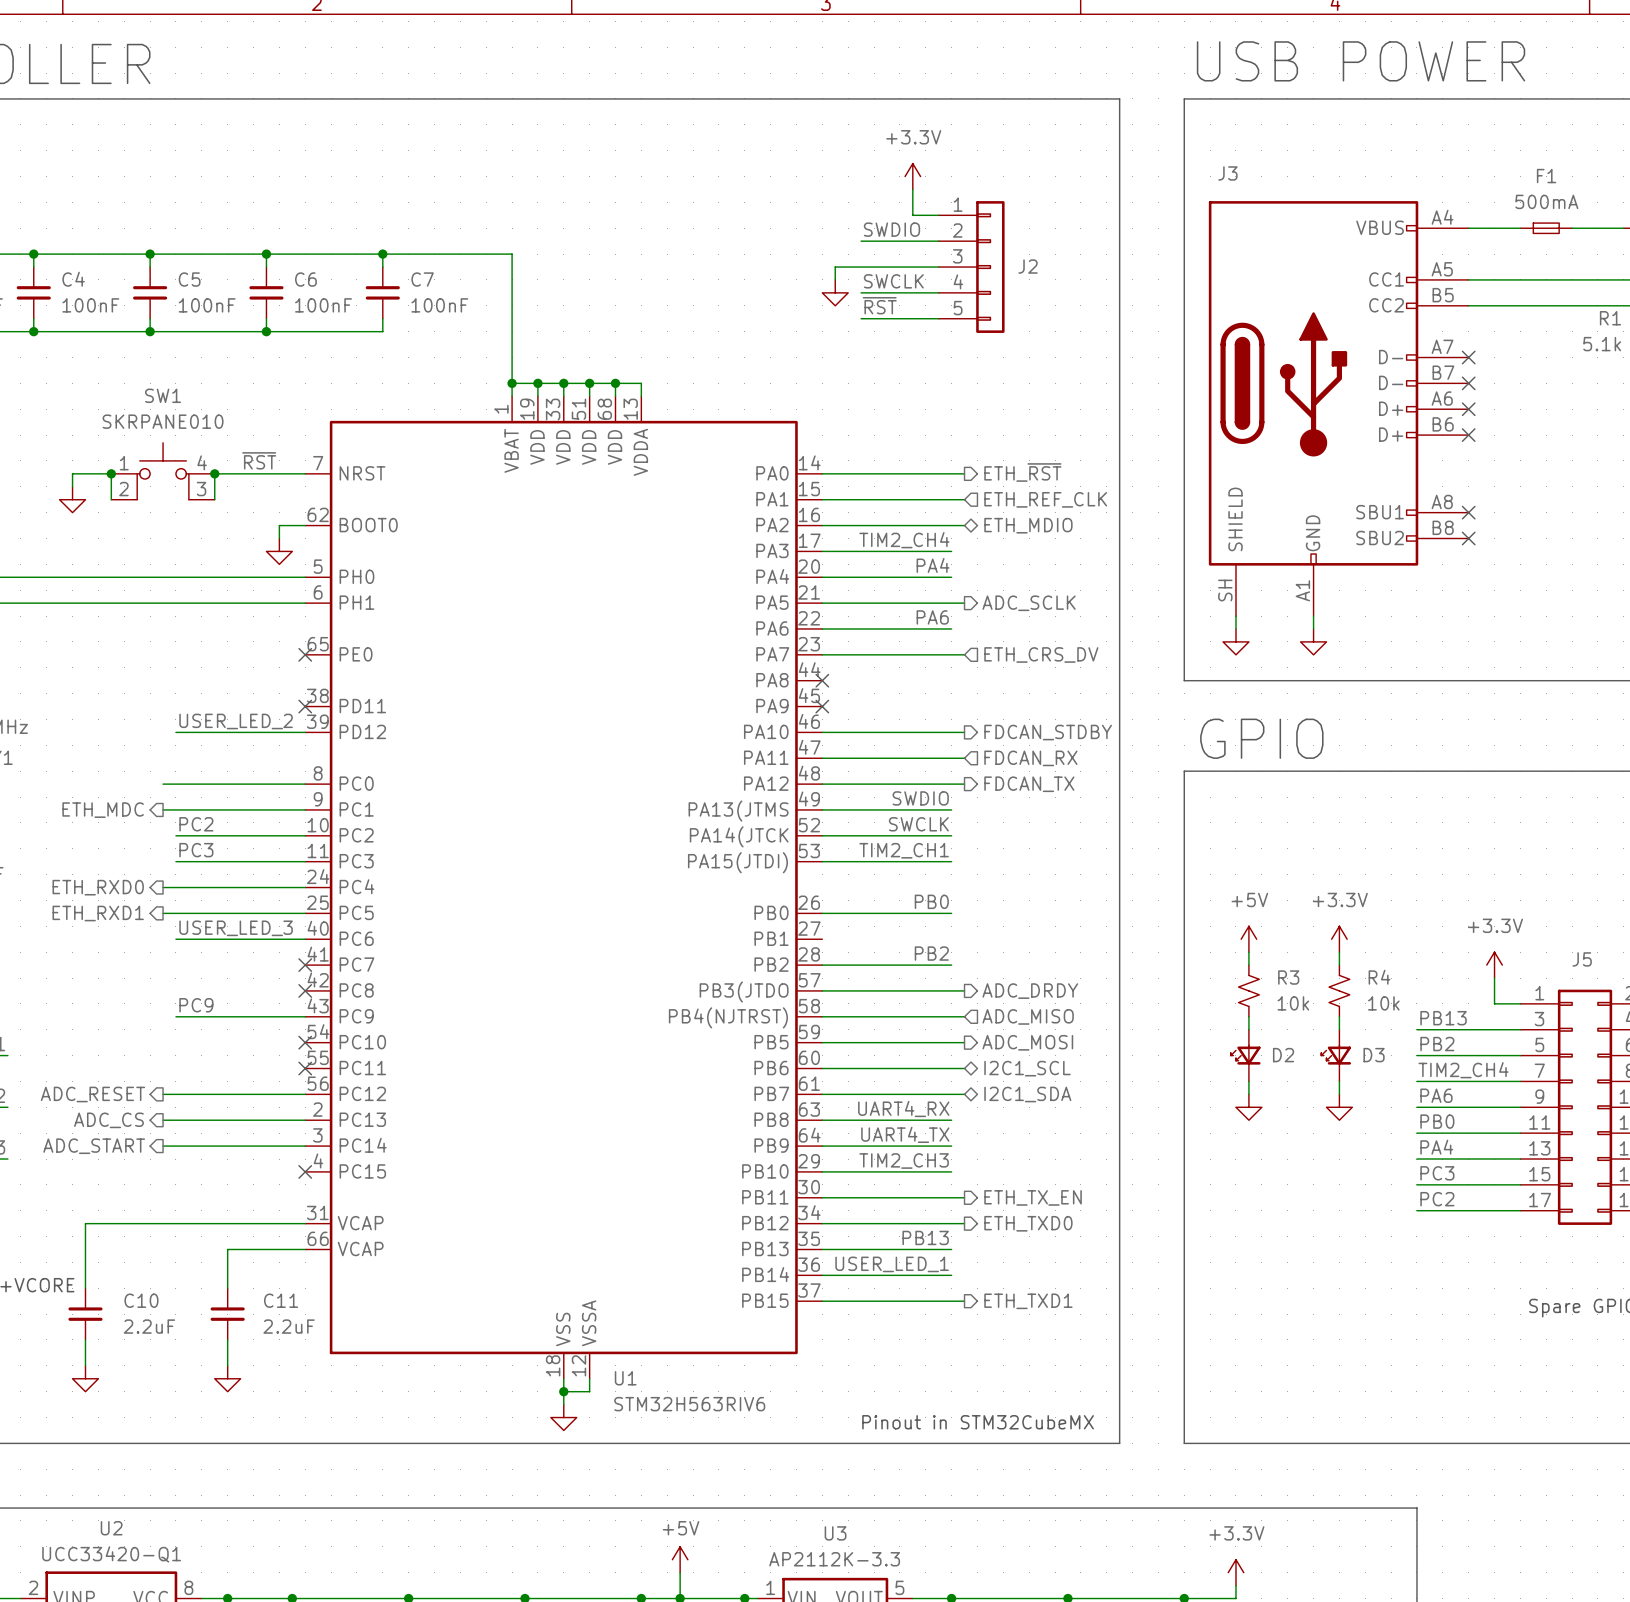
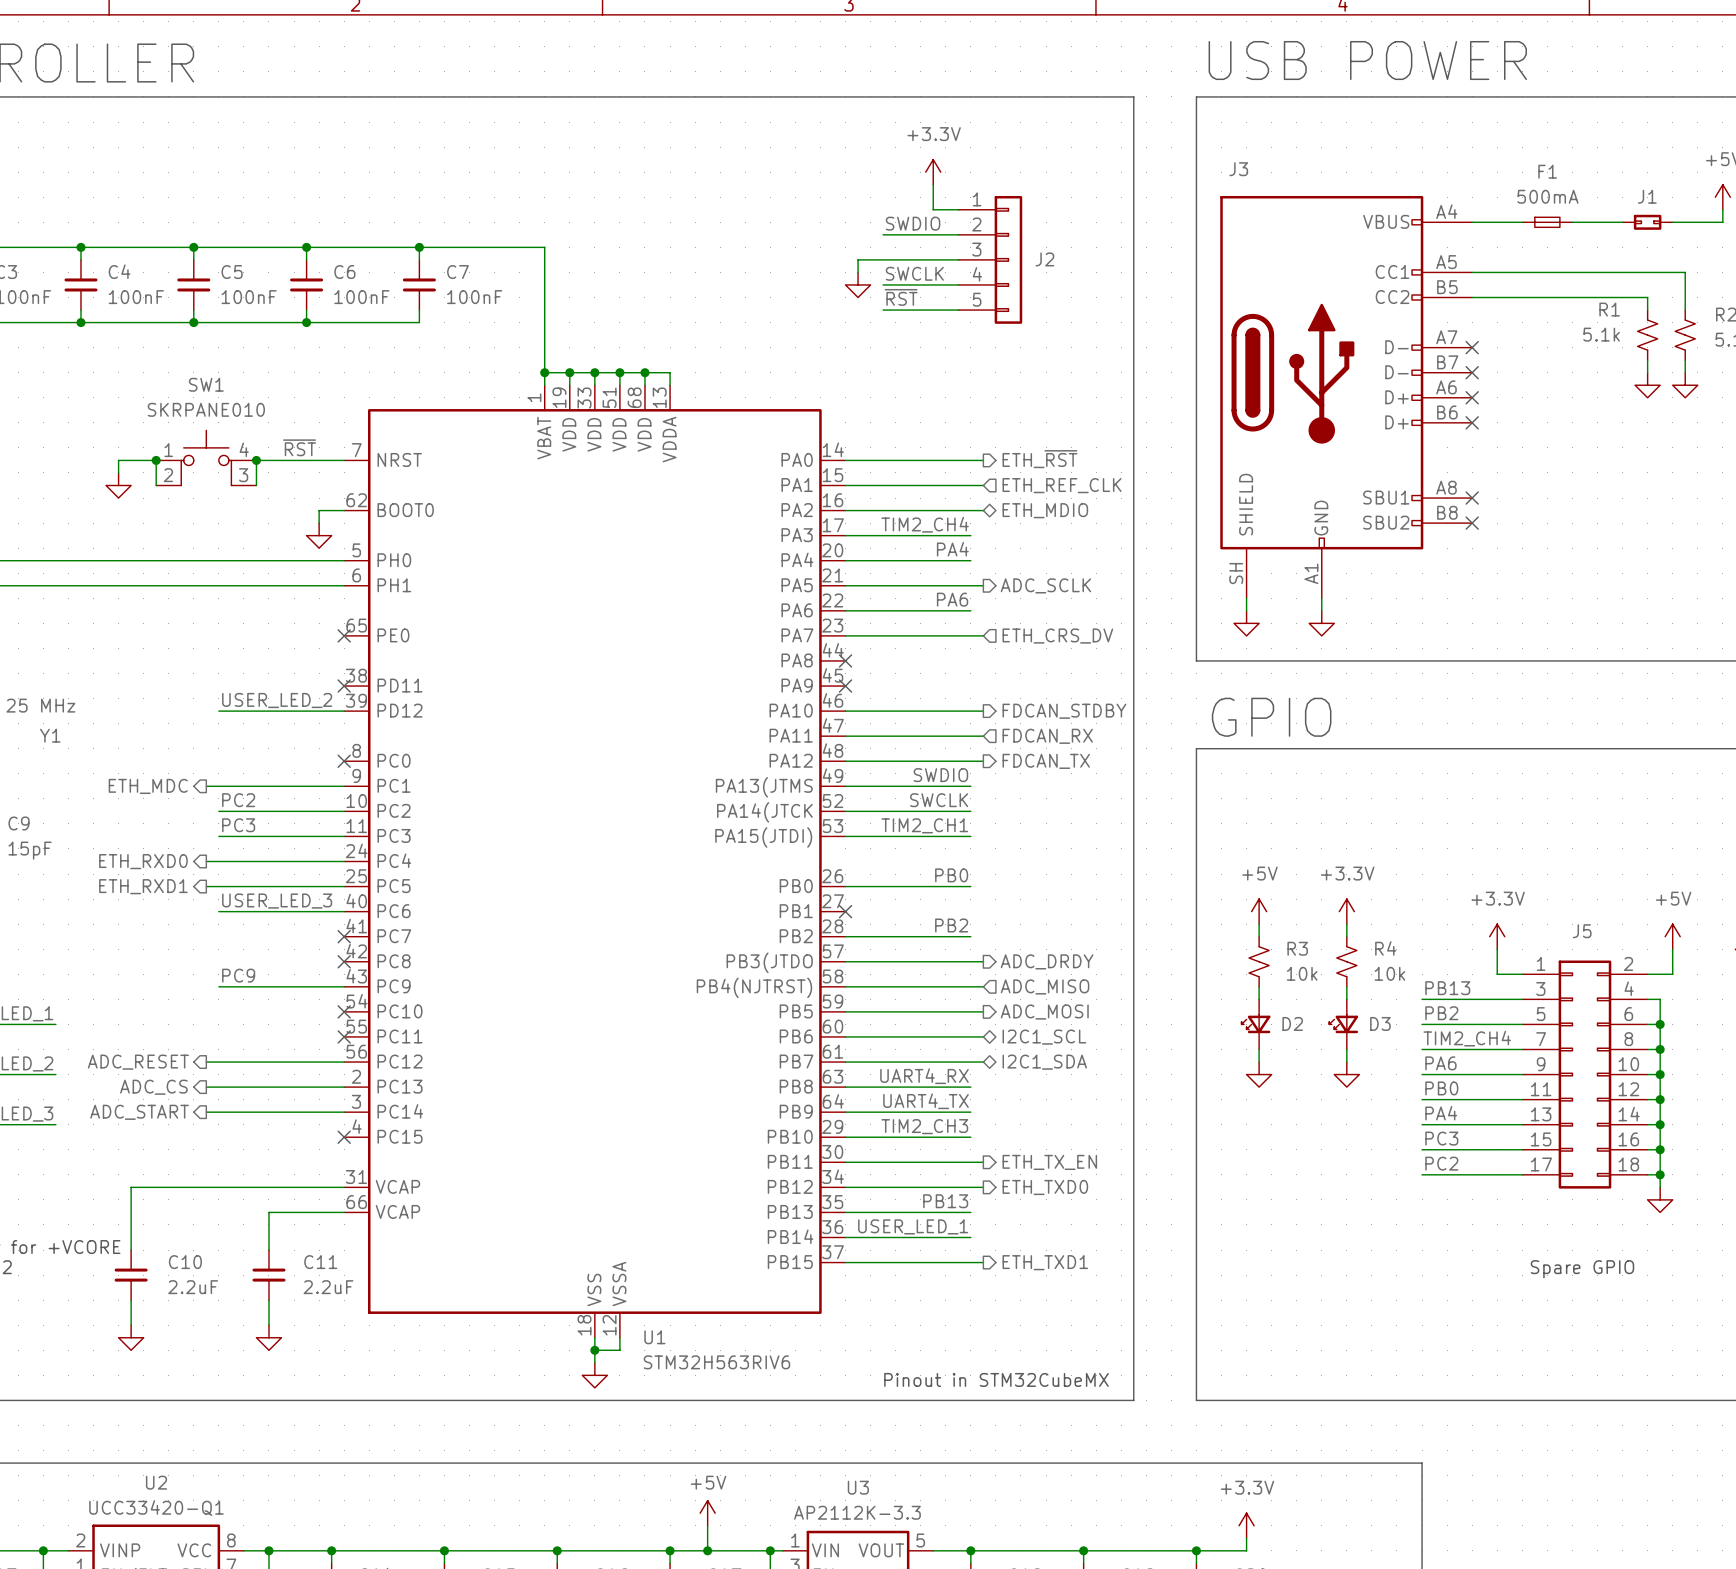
wire: (163, 784) (305, 784) -> none
no-connect mark: none -> (344, 761)
no-connect mark: none -> (845, 911)

